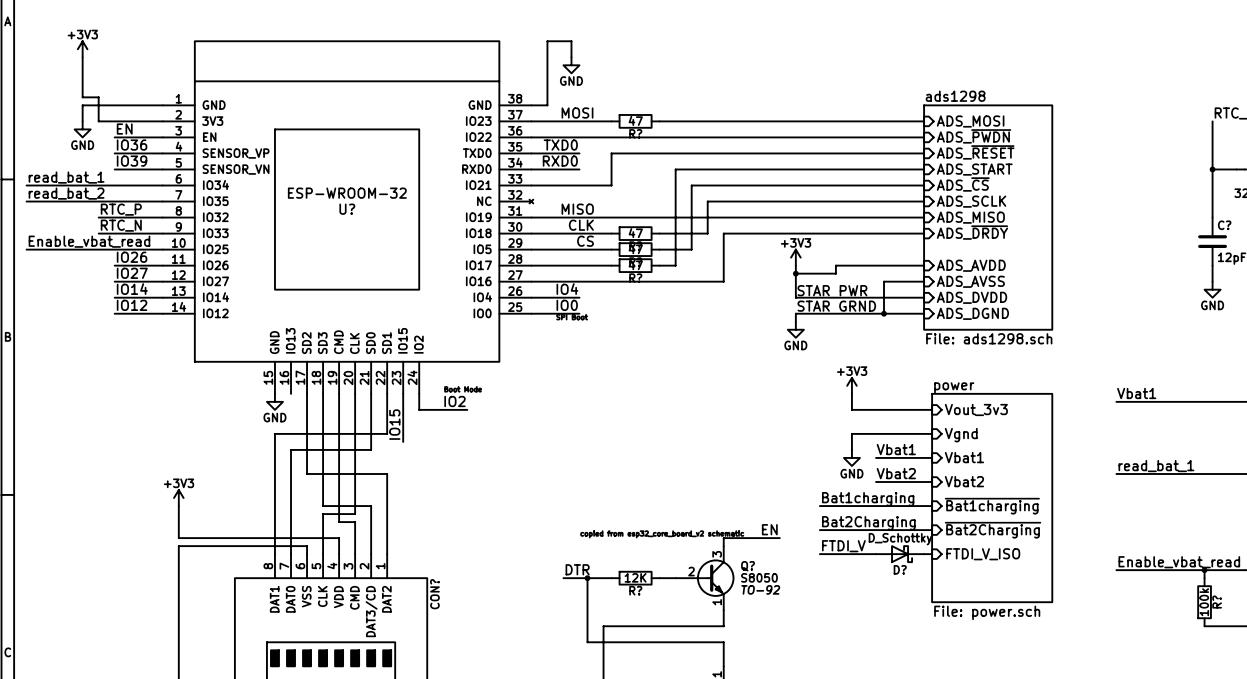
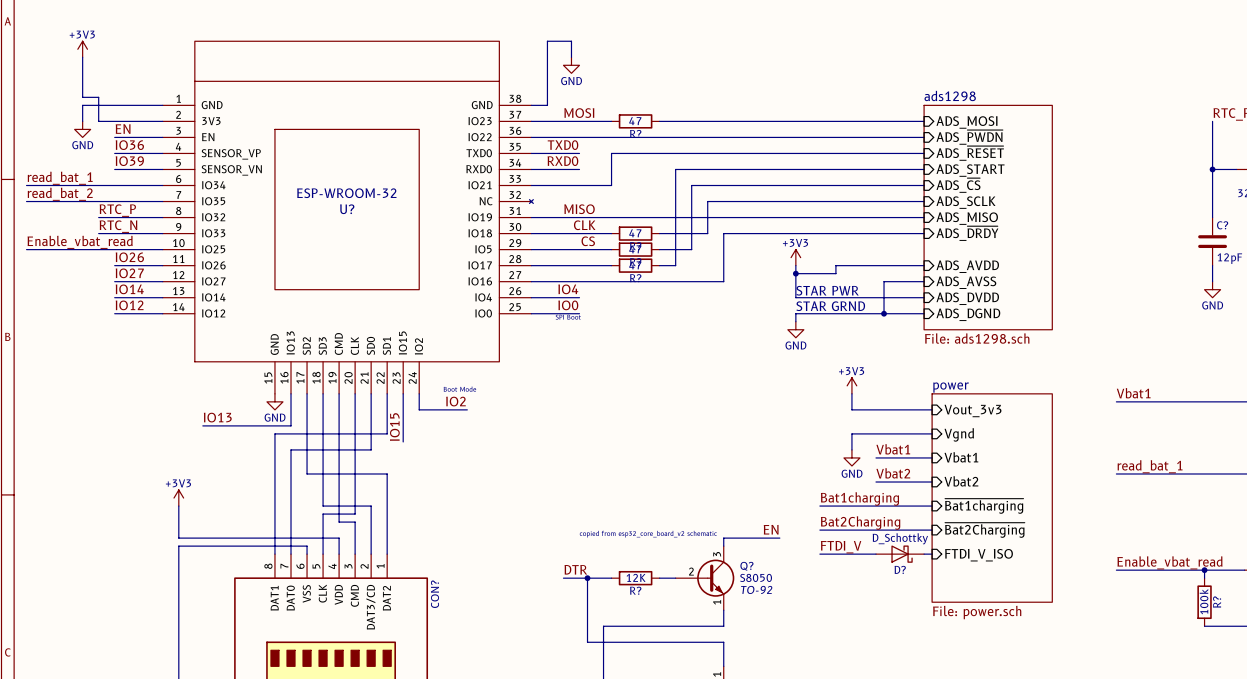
wire: none -> (291, 393) (291, 425) (202, 425)
label: none -> IO13 (217, 417)

